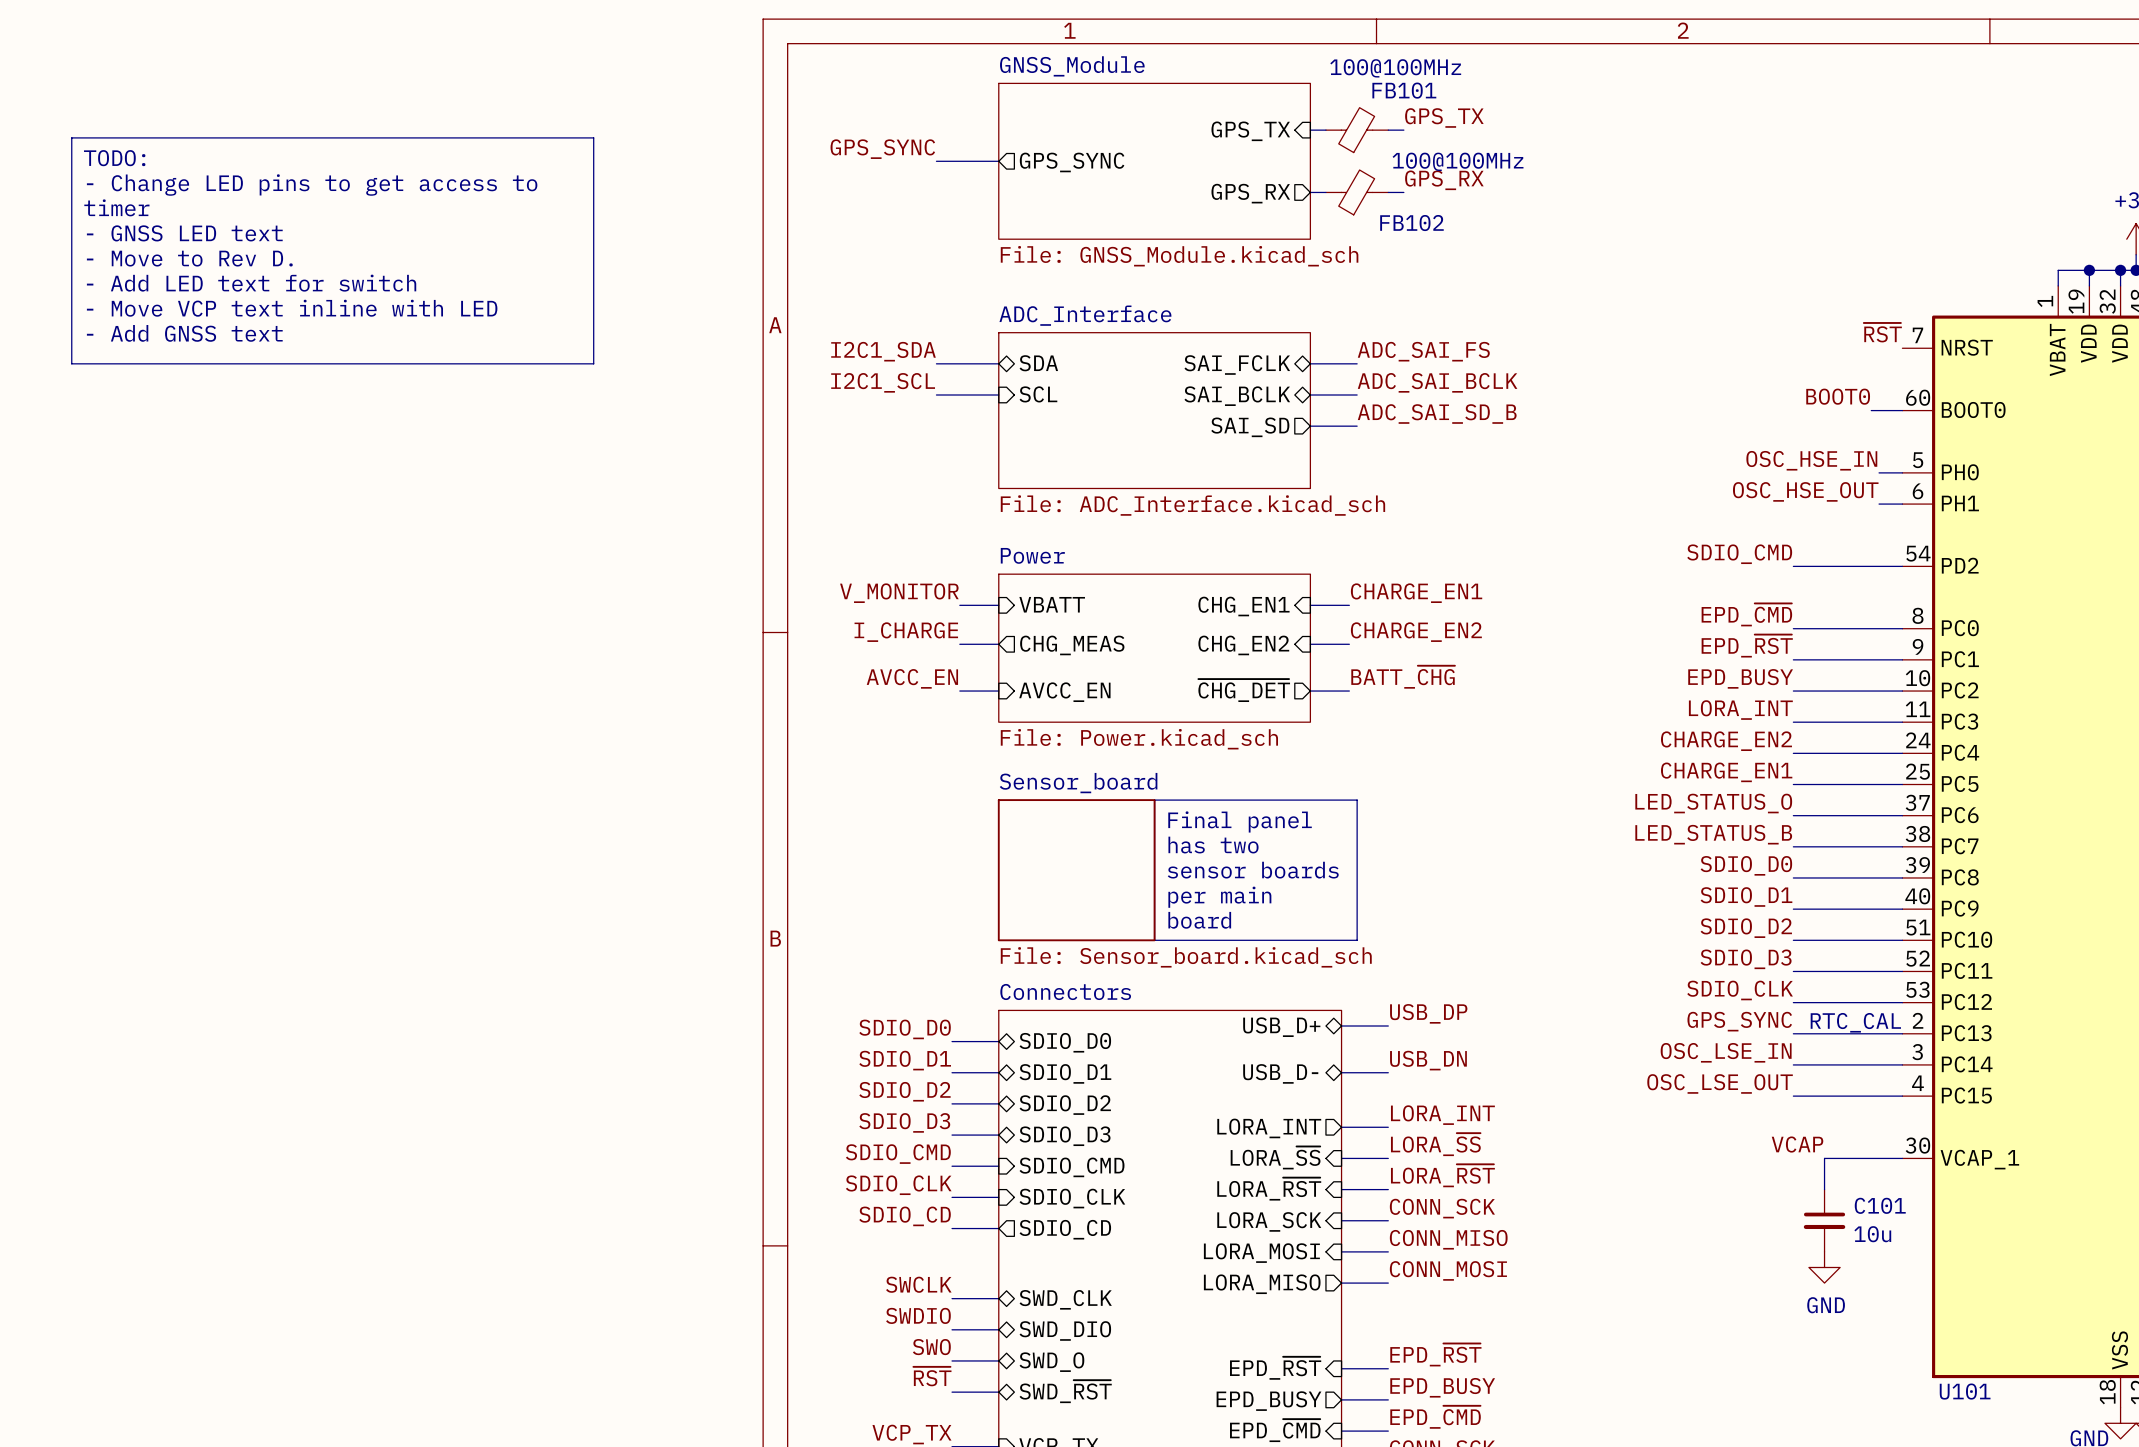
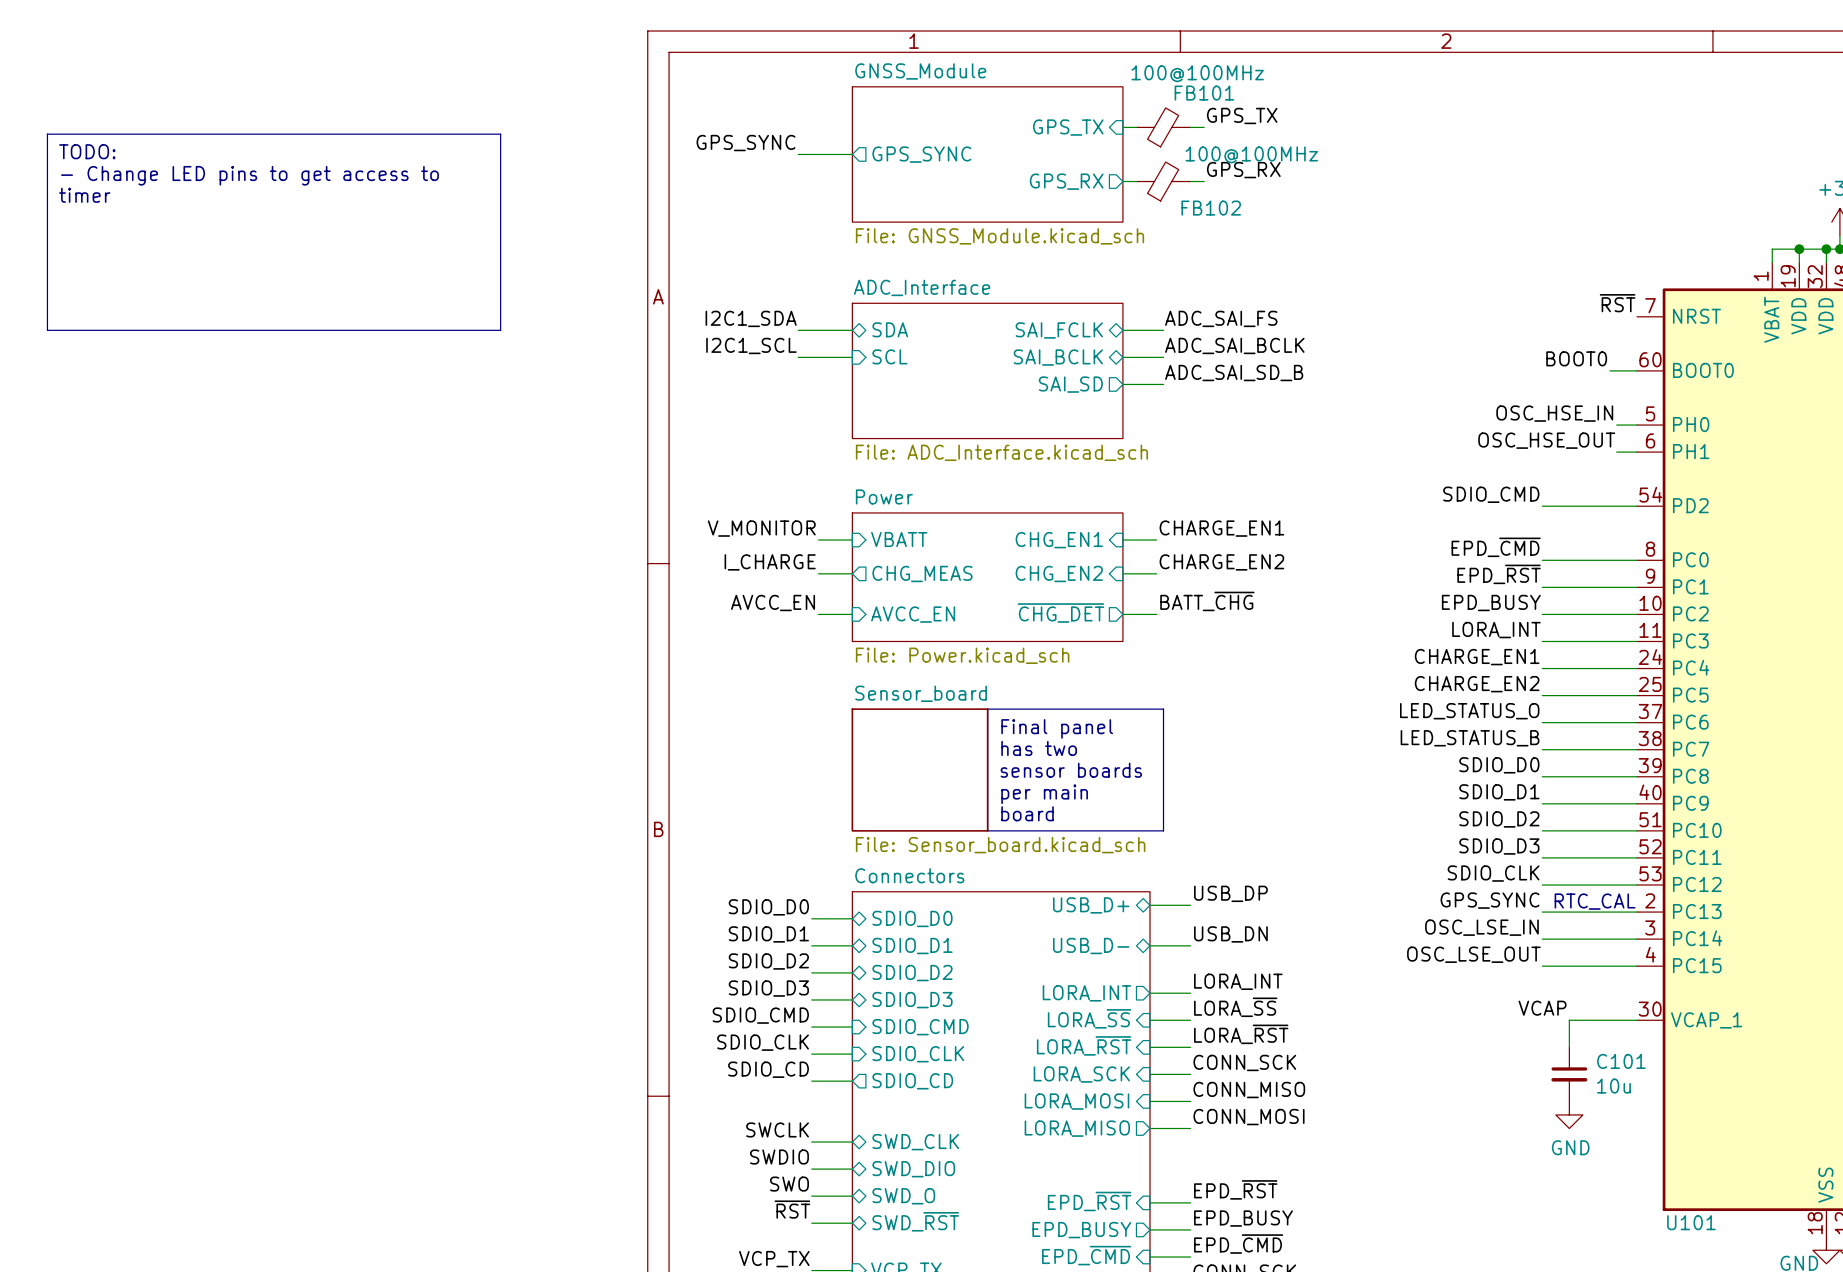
text: - GNSS LED text (184, 233) -> none
text: - Move to Rev D. (189, 258) -> none
text: - Add LED text for switch (251, 283) -> none
text: - Move VCP text inline with LED (292, 308) -> none
text: - Add GNSS text (184, 333) -> none
label: CHARGE_EN2 (1726, 741) -> CHARGE_EN1 (1477, 657)
label: CHARGE_EN1 (1726, 772) -> CHARGE_EN2 (1477, 684)

